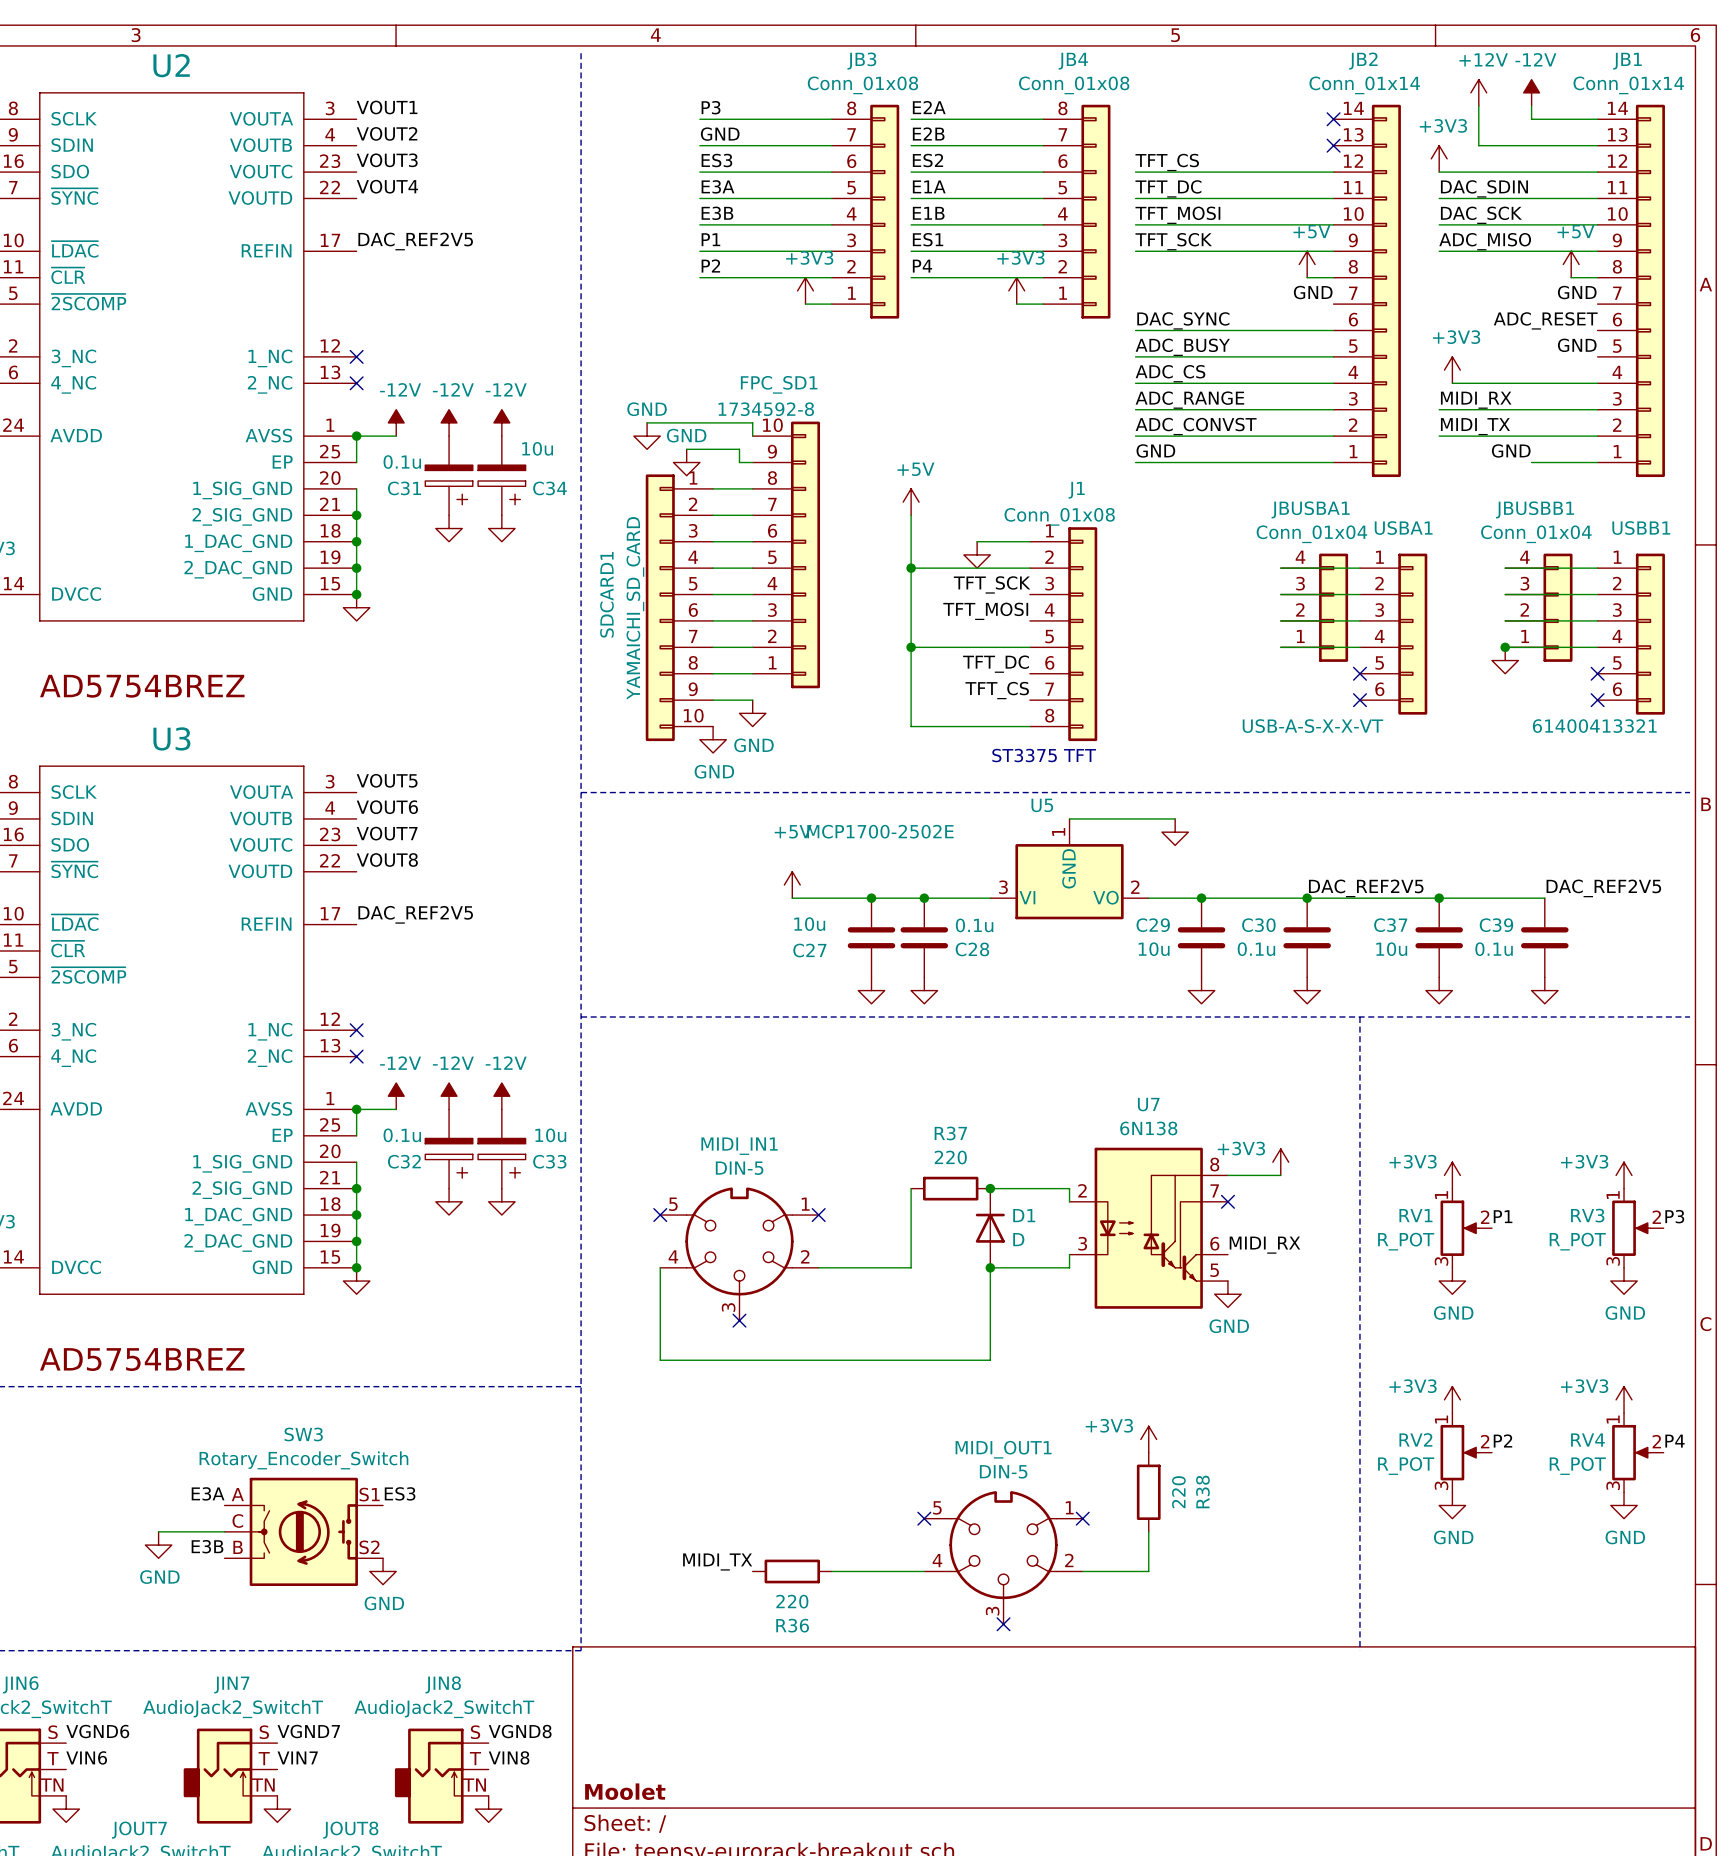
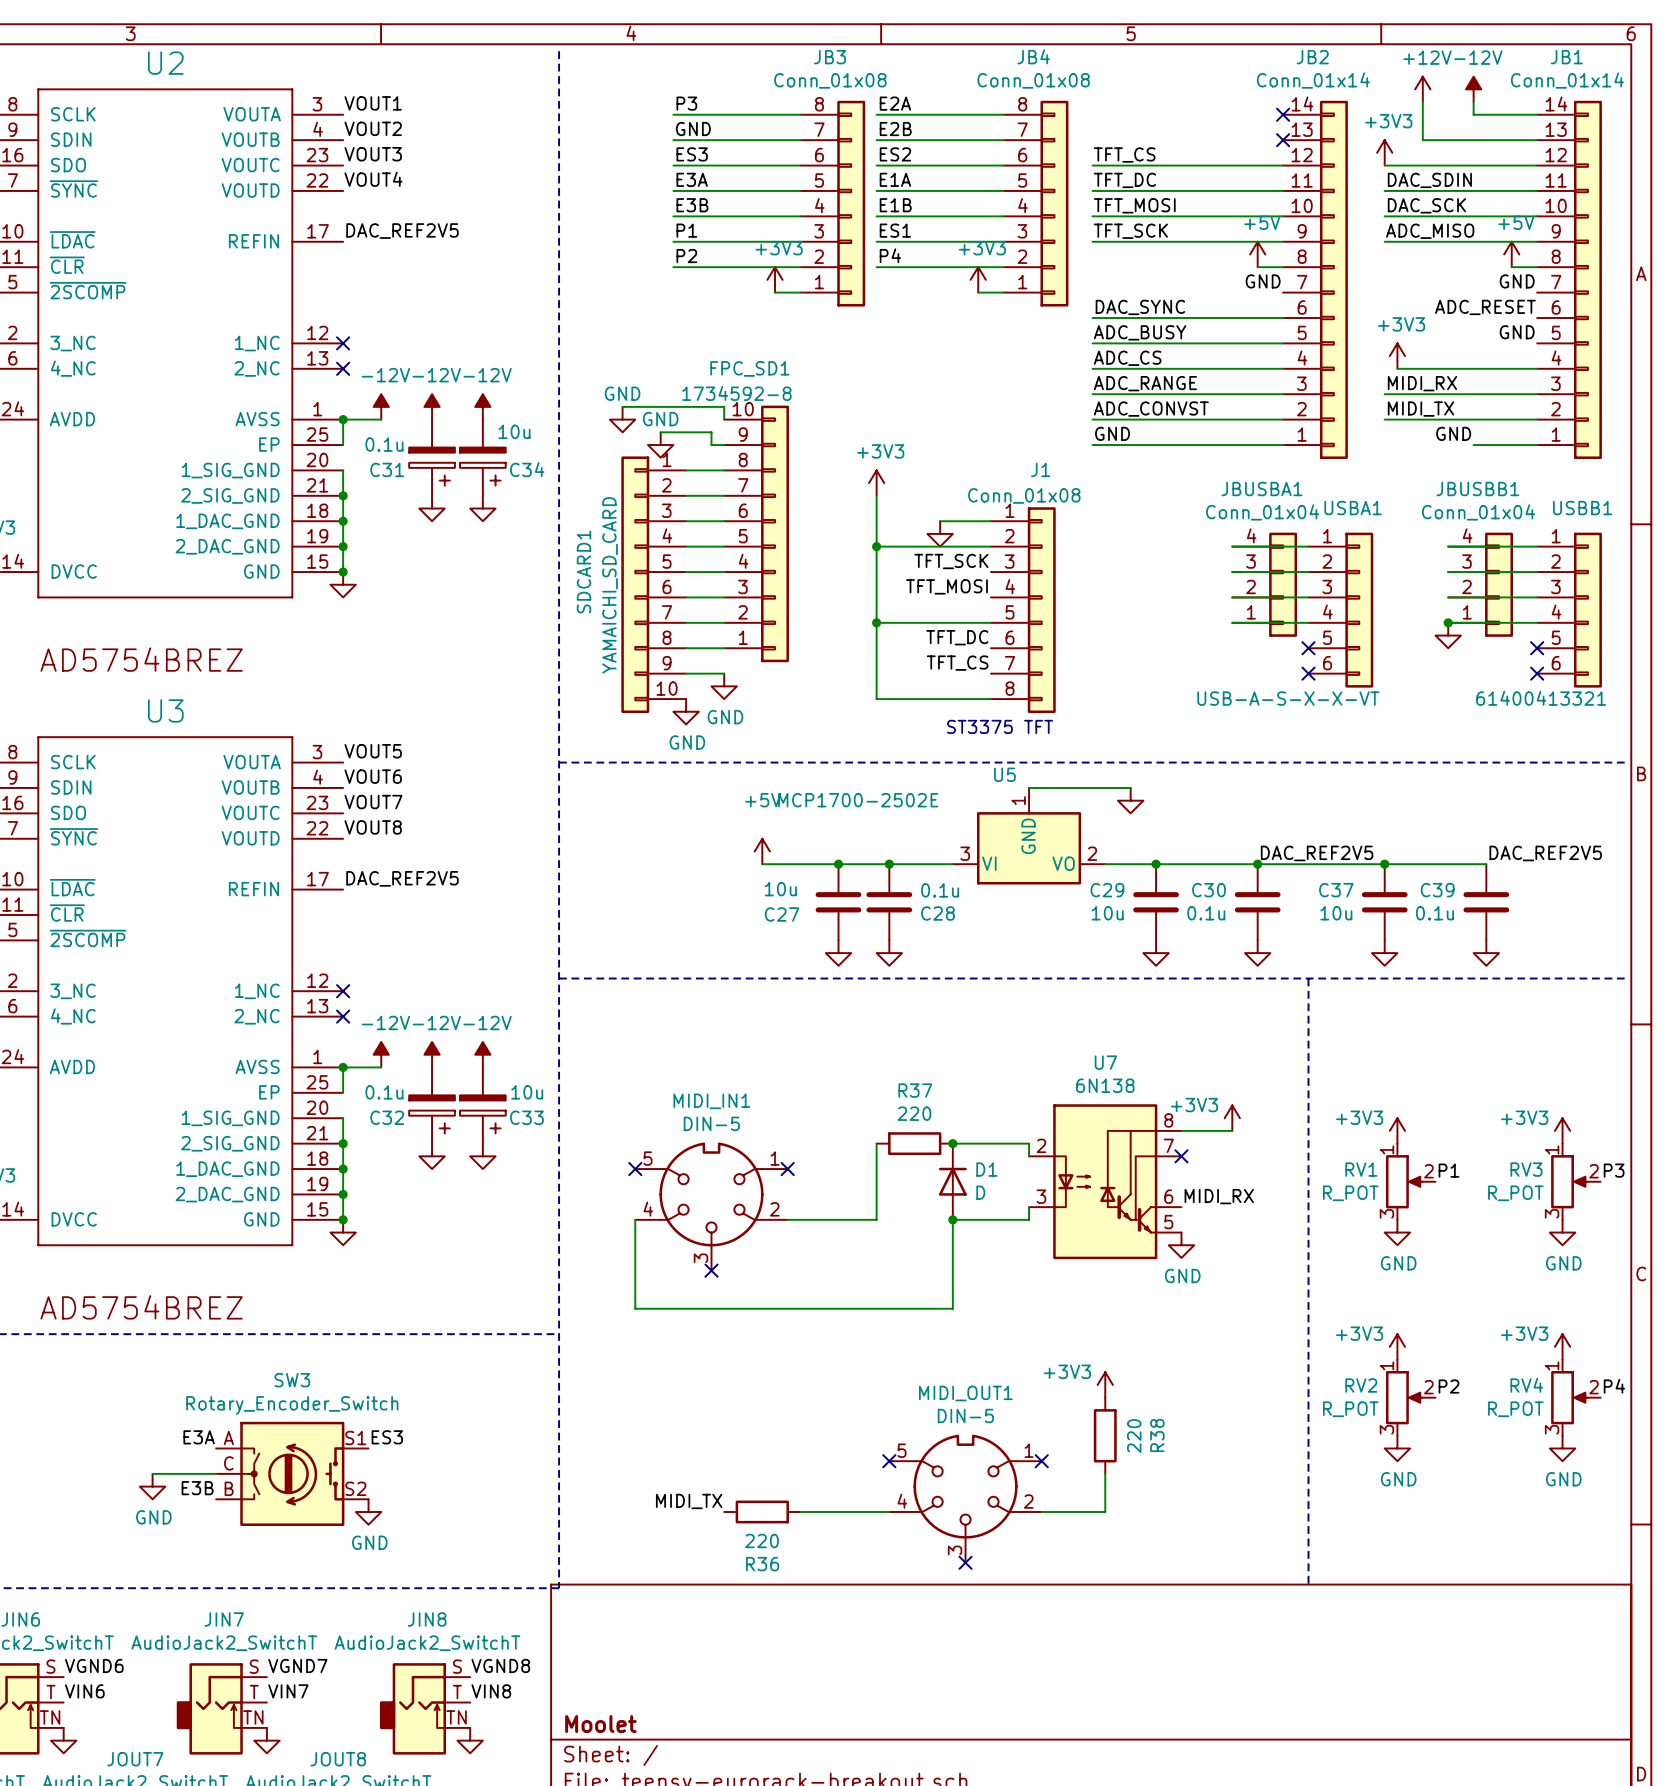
power symbol: +5V (911, 502) -> +3V3 (876, 483)

